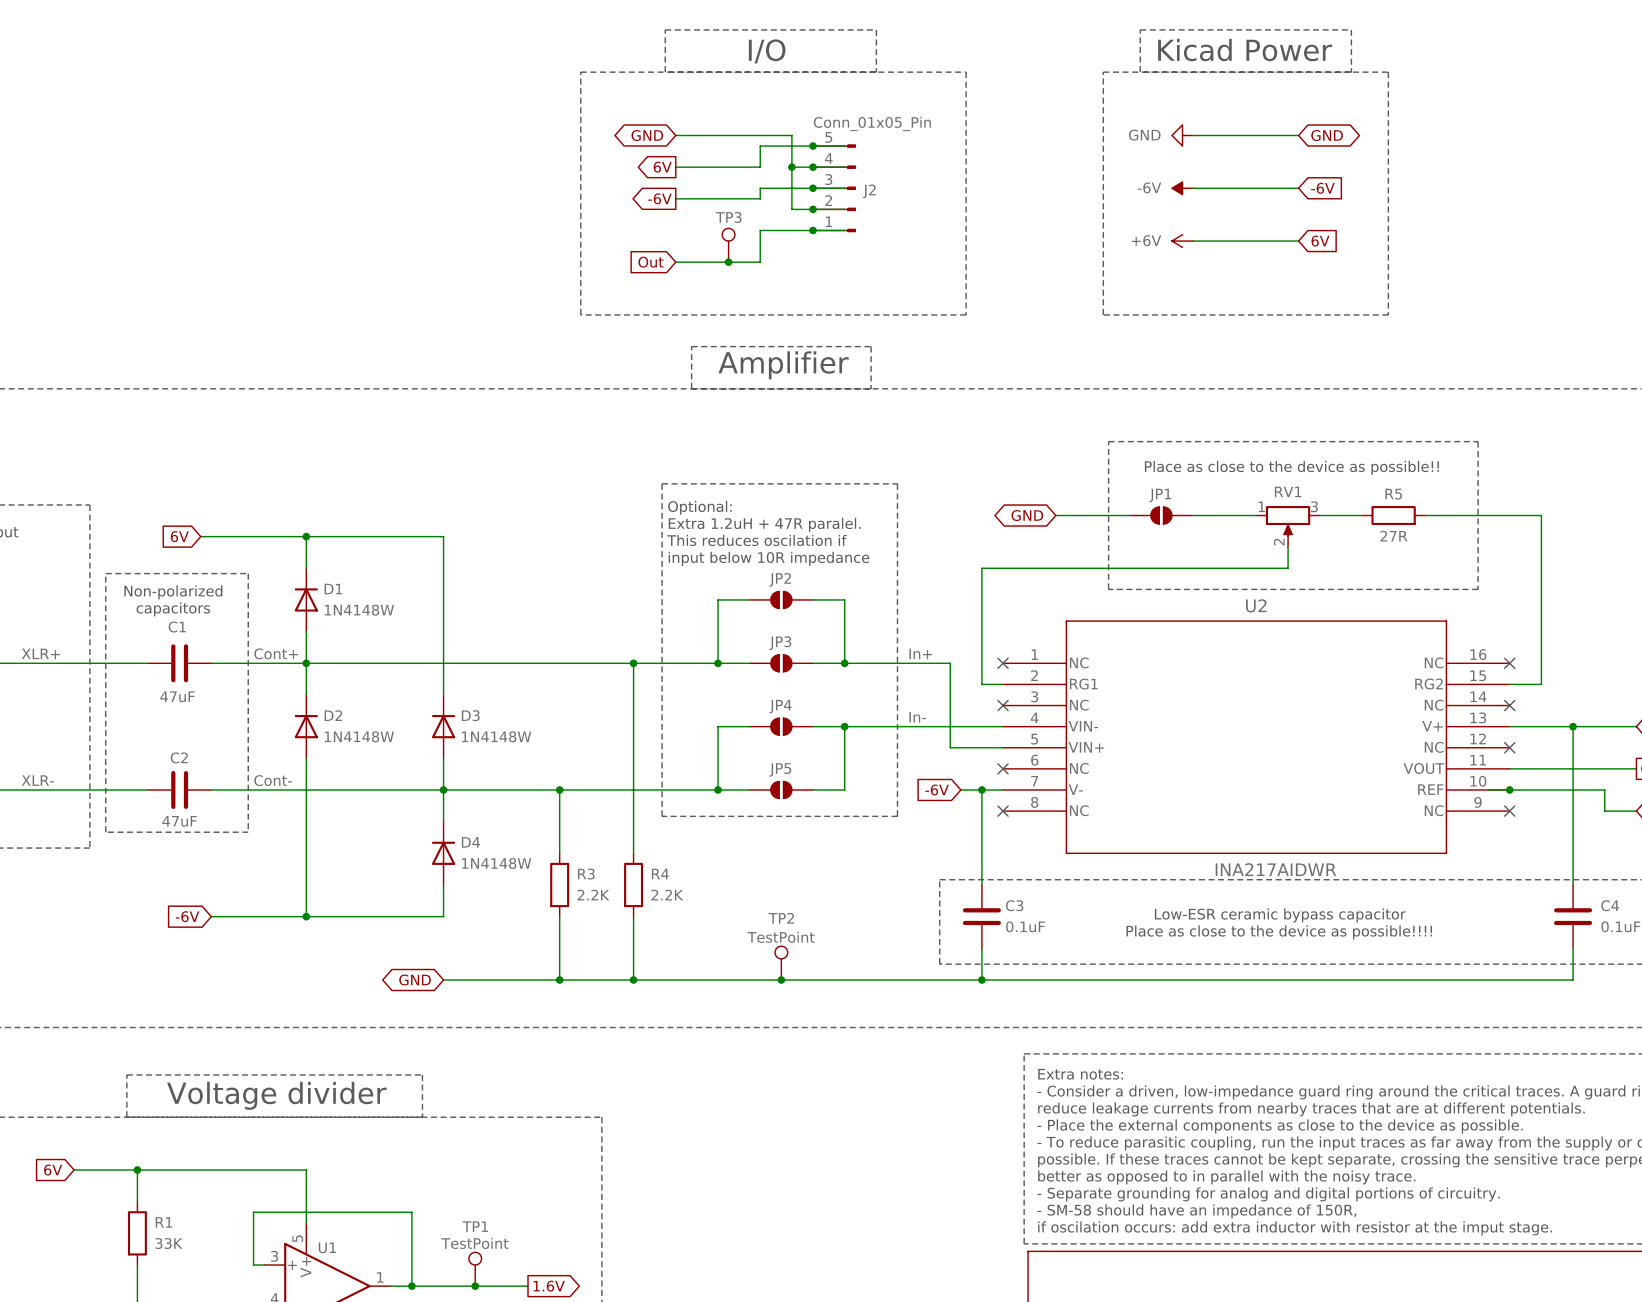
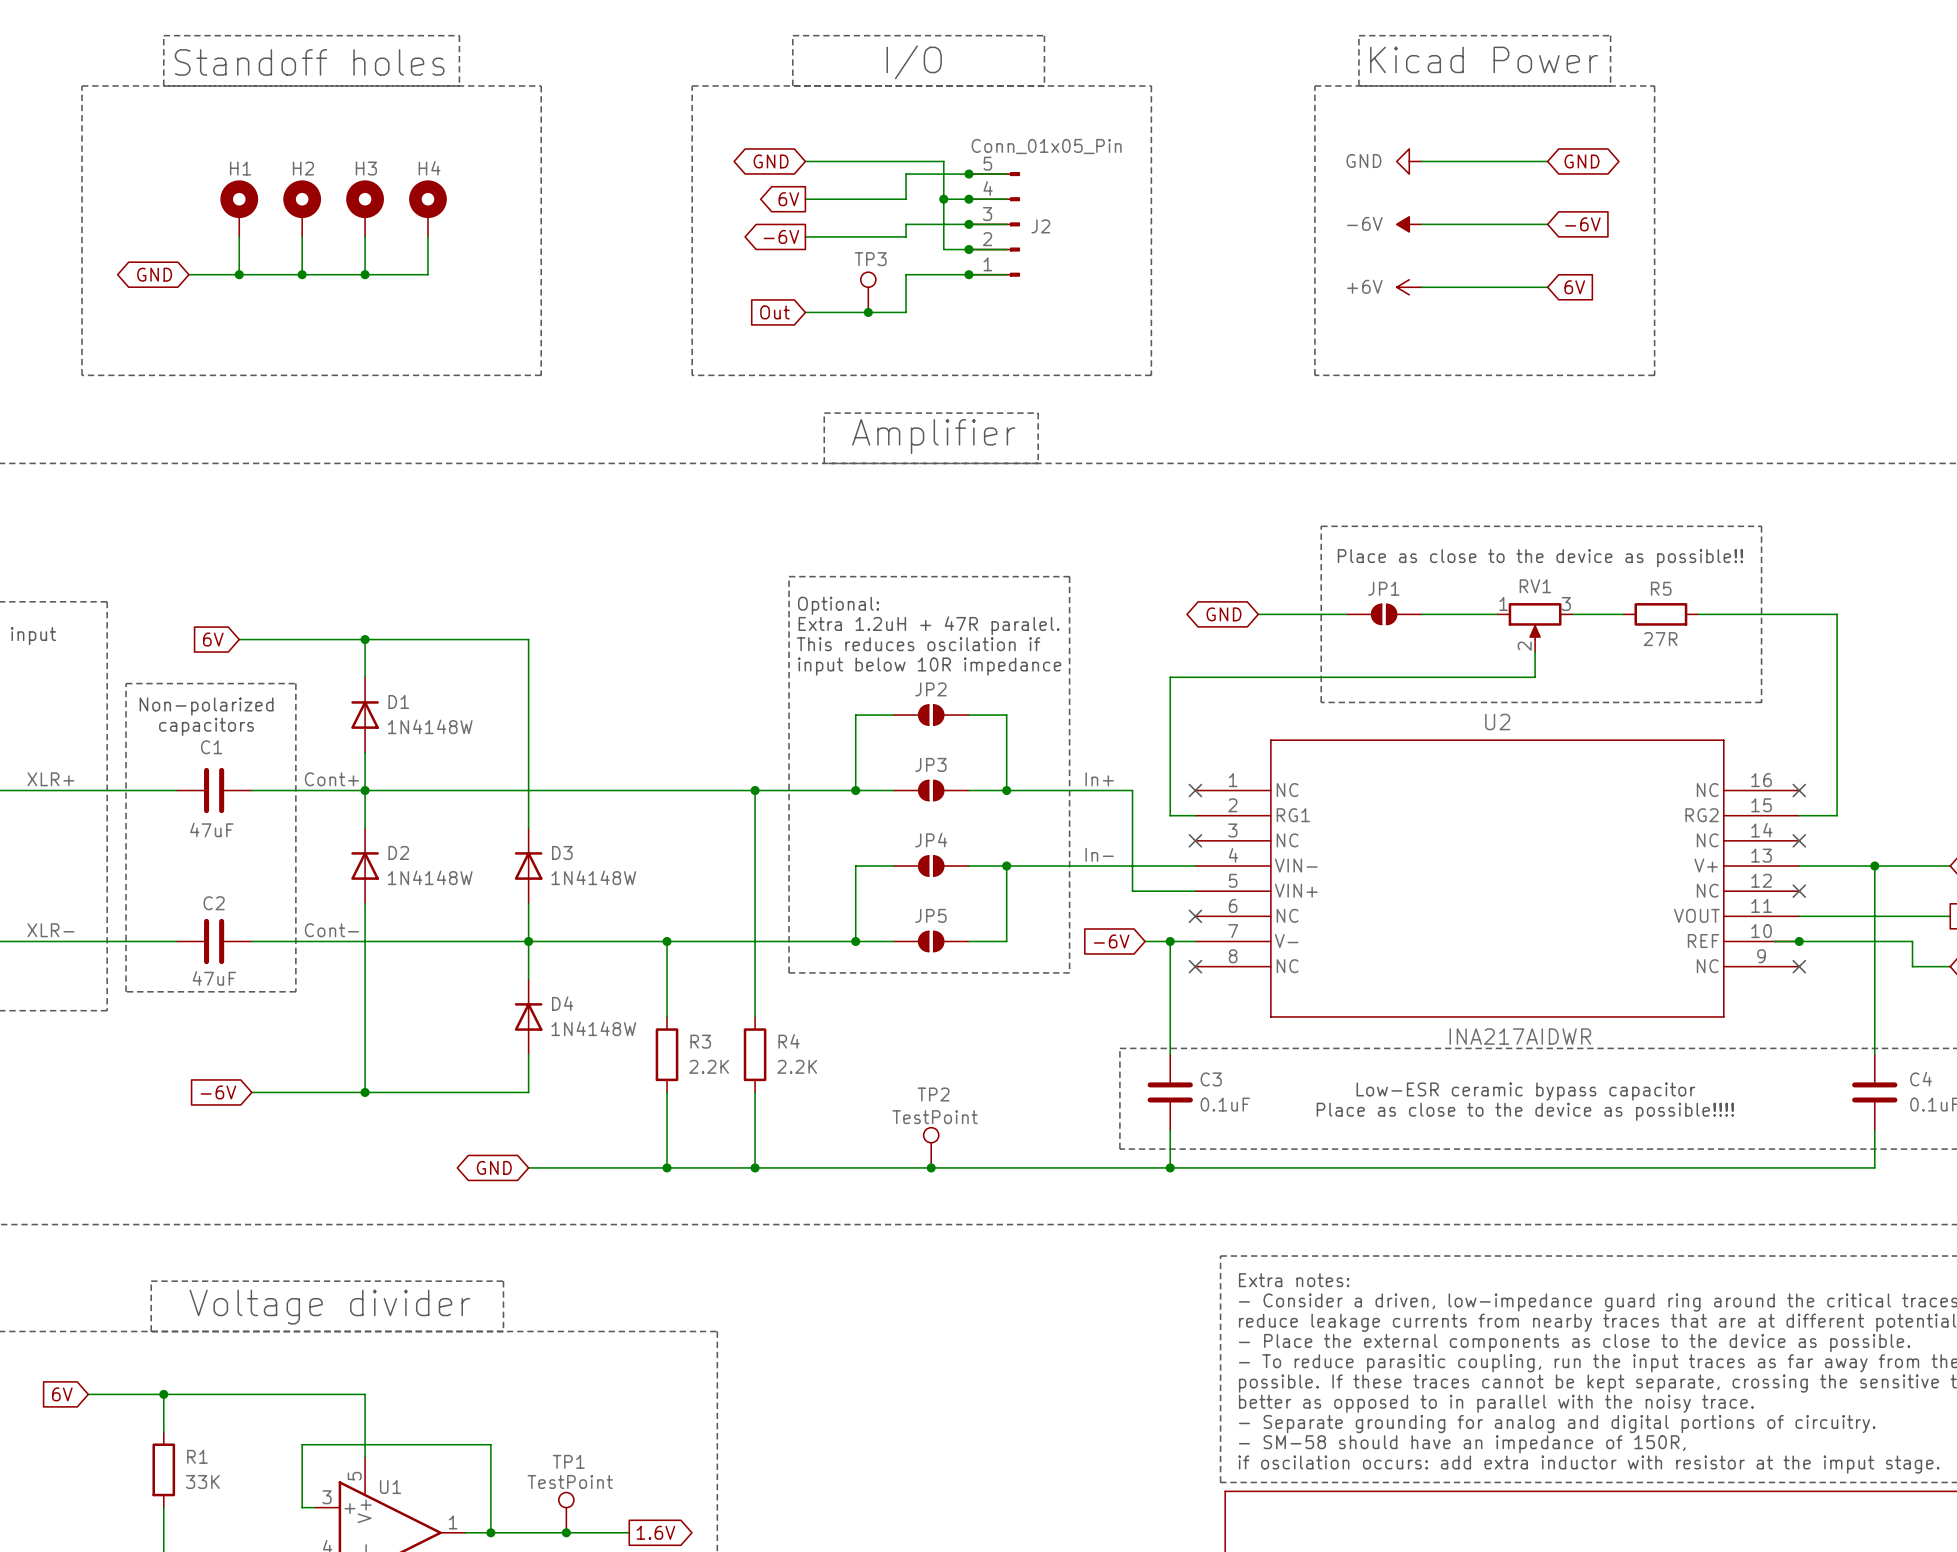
text: none -> Standoff holes (309, 62)
line: none -> (82, 85) (541, 85) (541, 375) (82, 375) (82, 85)
line: none -> (163, 85) (163, 35) (459, 35) (459, 85)
H1: none -> (239, 208)
H2: none -> (302, 208)
H3: none -> (365, 208)
H4: none -> (427, 208)
wire: none -> (239, 236) (239, 274)
wire: none -> (302, 236) (302, 274)
wire: none -> (365, 236) (365, 274)
wire: none -> (427, 236) (427, 274) (188, 274)
global label: none -> GND (154, 274)
junction: none -> (239, 274)
junction: none -> (302, 274)
junction: none -> (365, 274)

